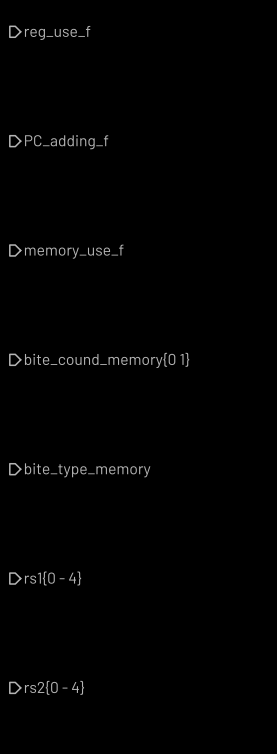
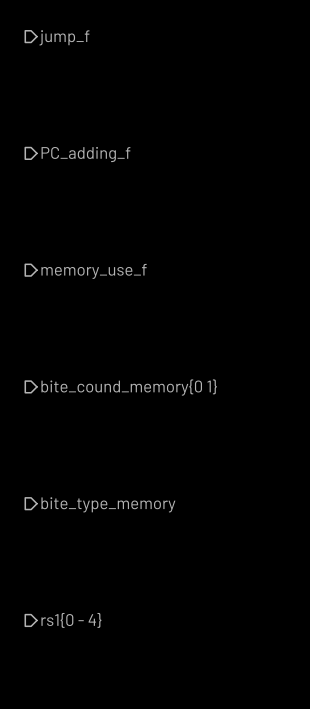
hierarchical label: reg_use_f (57, 32) -> jump_f (64, 37)

